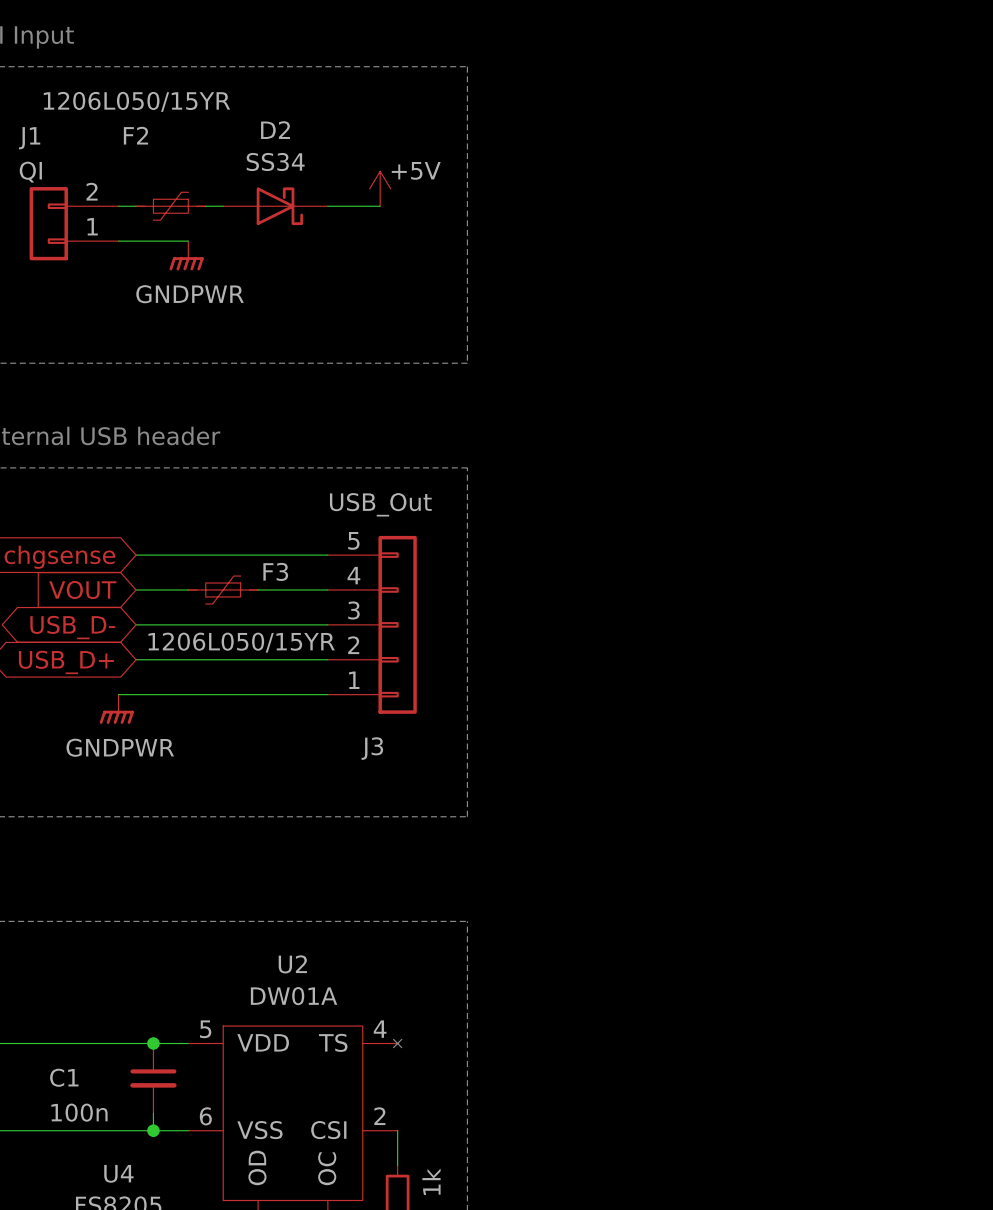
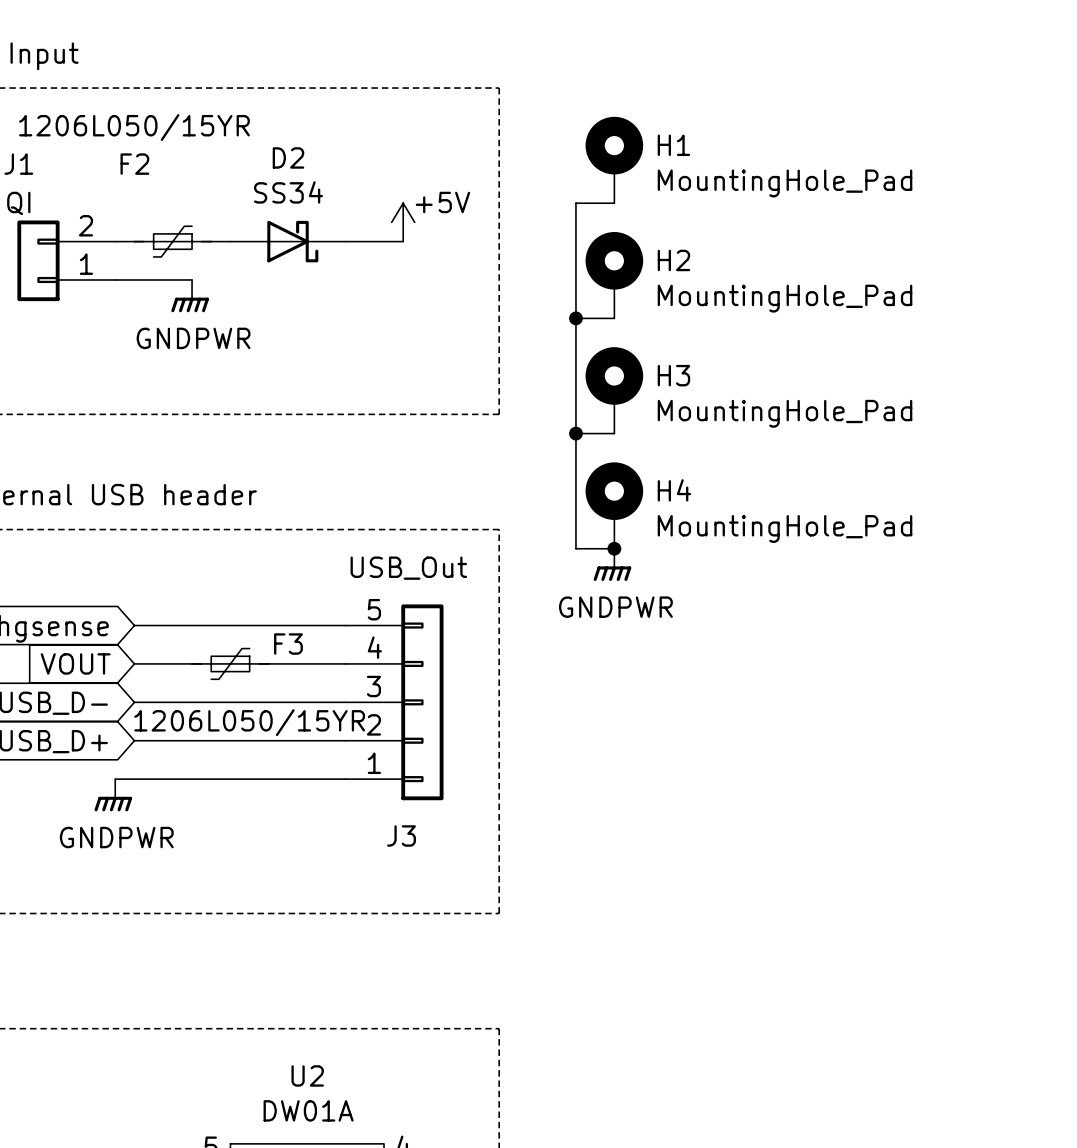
H1: none -> MountingHole_Pad (614, 160)
wire: none -> (614, 203) (575, 203) (575, 548) (614, 548)
H2: none -> MountingHole_Pad (614, 275)
wire: none -> (575, 318) (614, 318)
junction: none -> (575, 318)
H3: none -> MountingHole_Pad (614, 390)
wire: none -> (575, 433) (614, 433)
junction: none -> (575, 433)
H4: none -> MountingHole_Pad (614, 505)
junction: none -> (614, 548)
power symbol: none -> GNDPWR (612, 564)

